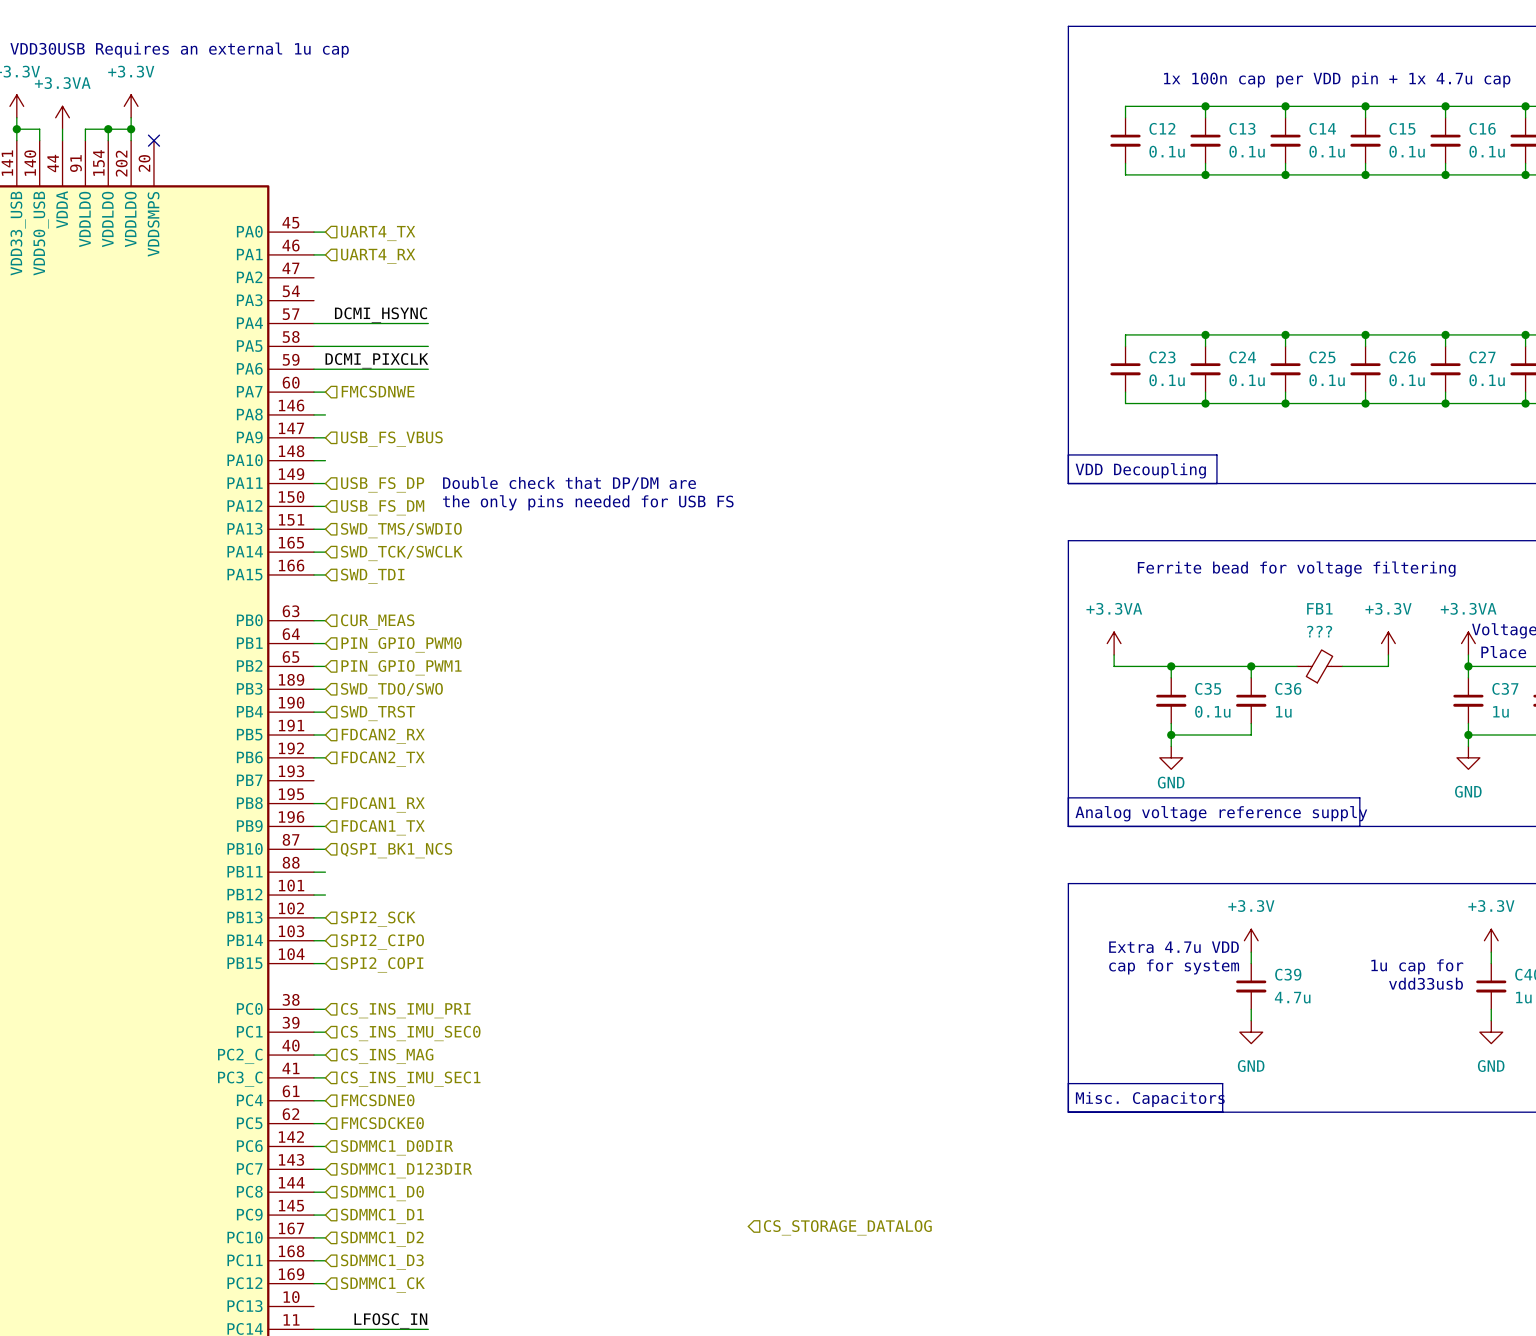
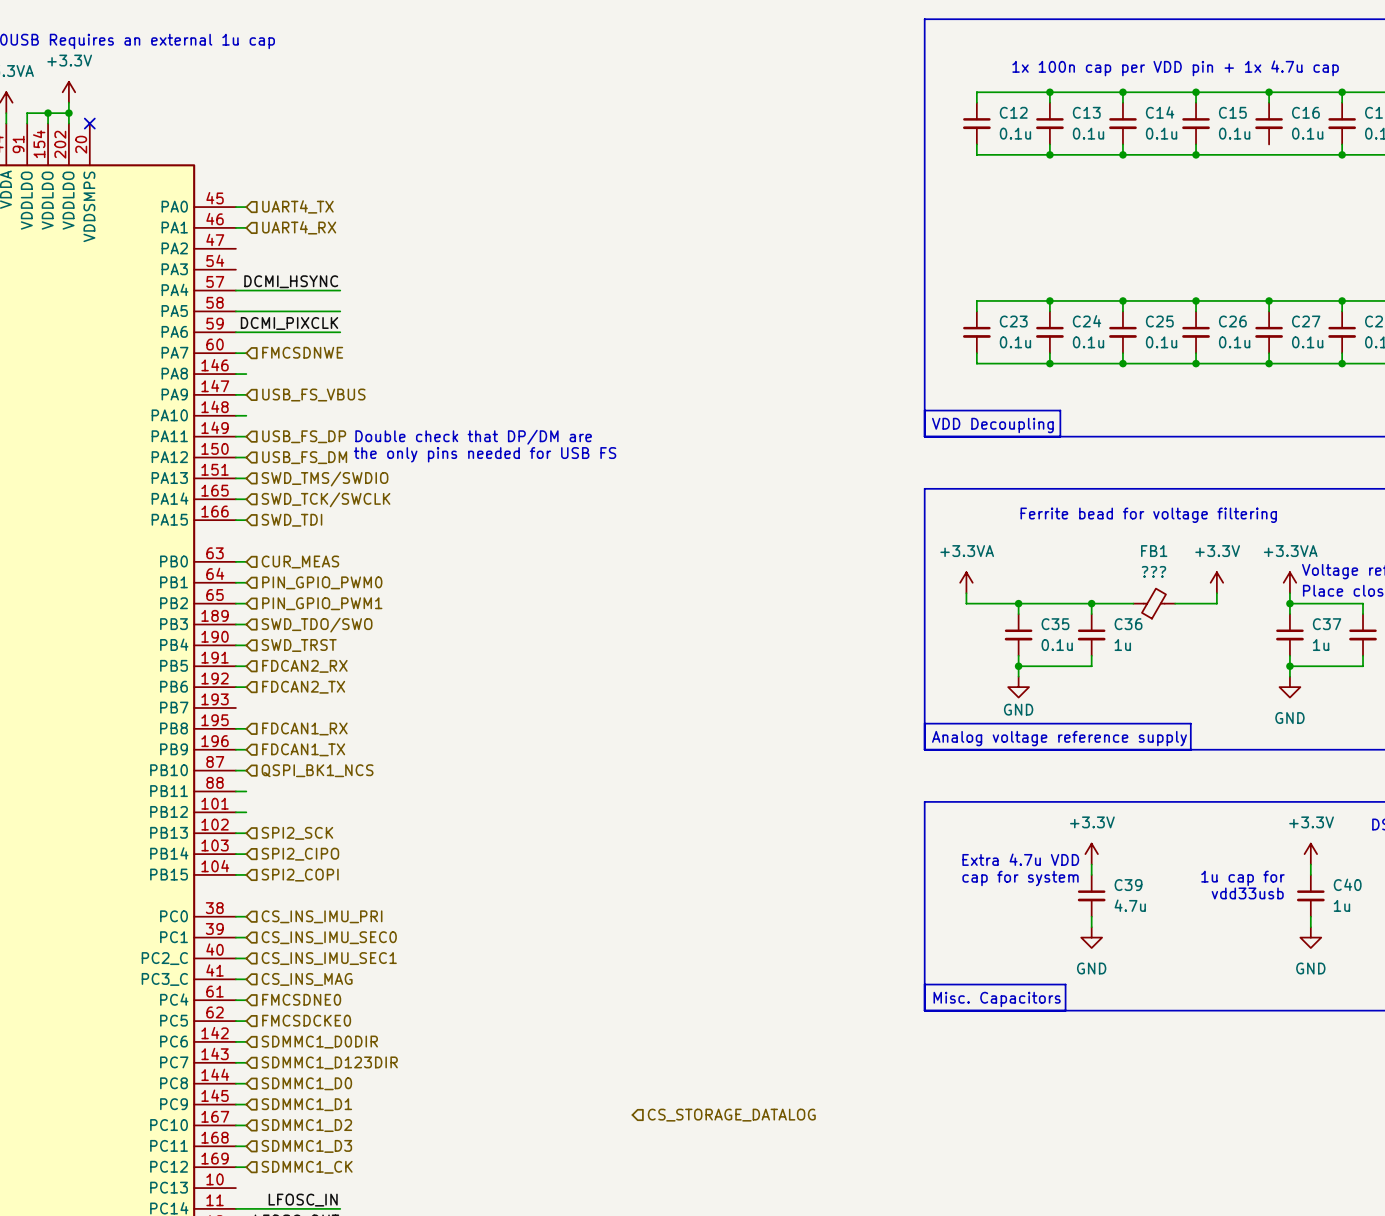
wire: (1445, 163) (1445, 174) -> none
junction: (1445, 174) -> none
hierarchical label: CS_INS_MAG (387, 1056) -> CS_INS_IMU_SEC1 (329, 958)
hierarchical label: CS_INS_IMU_SEC1 (410, 1079) -> CS_INS_MAG (307, 979)

